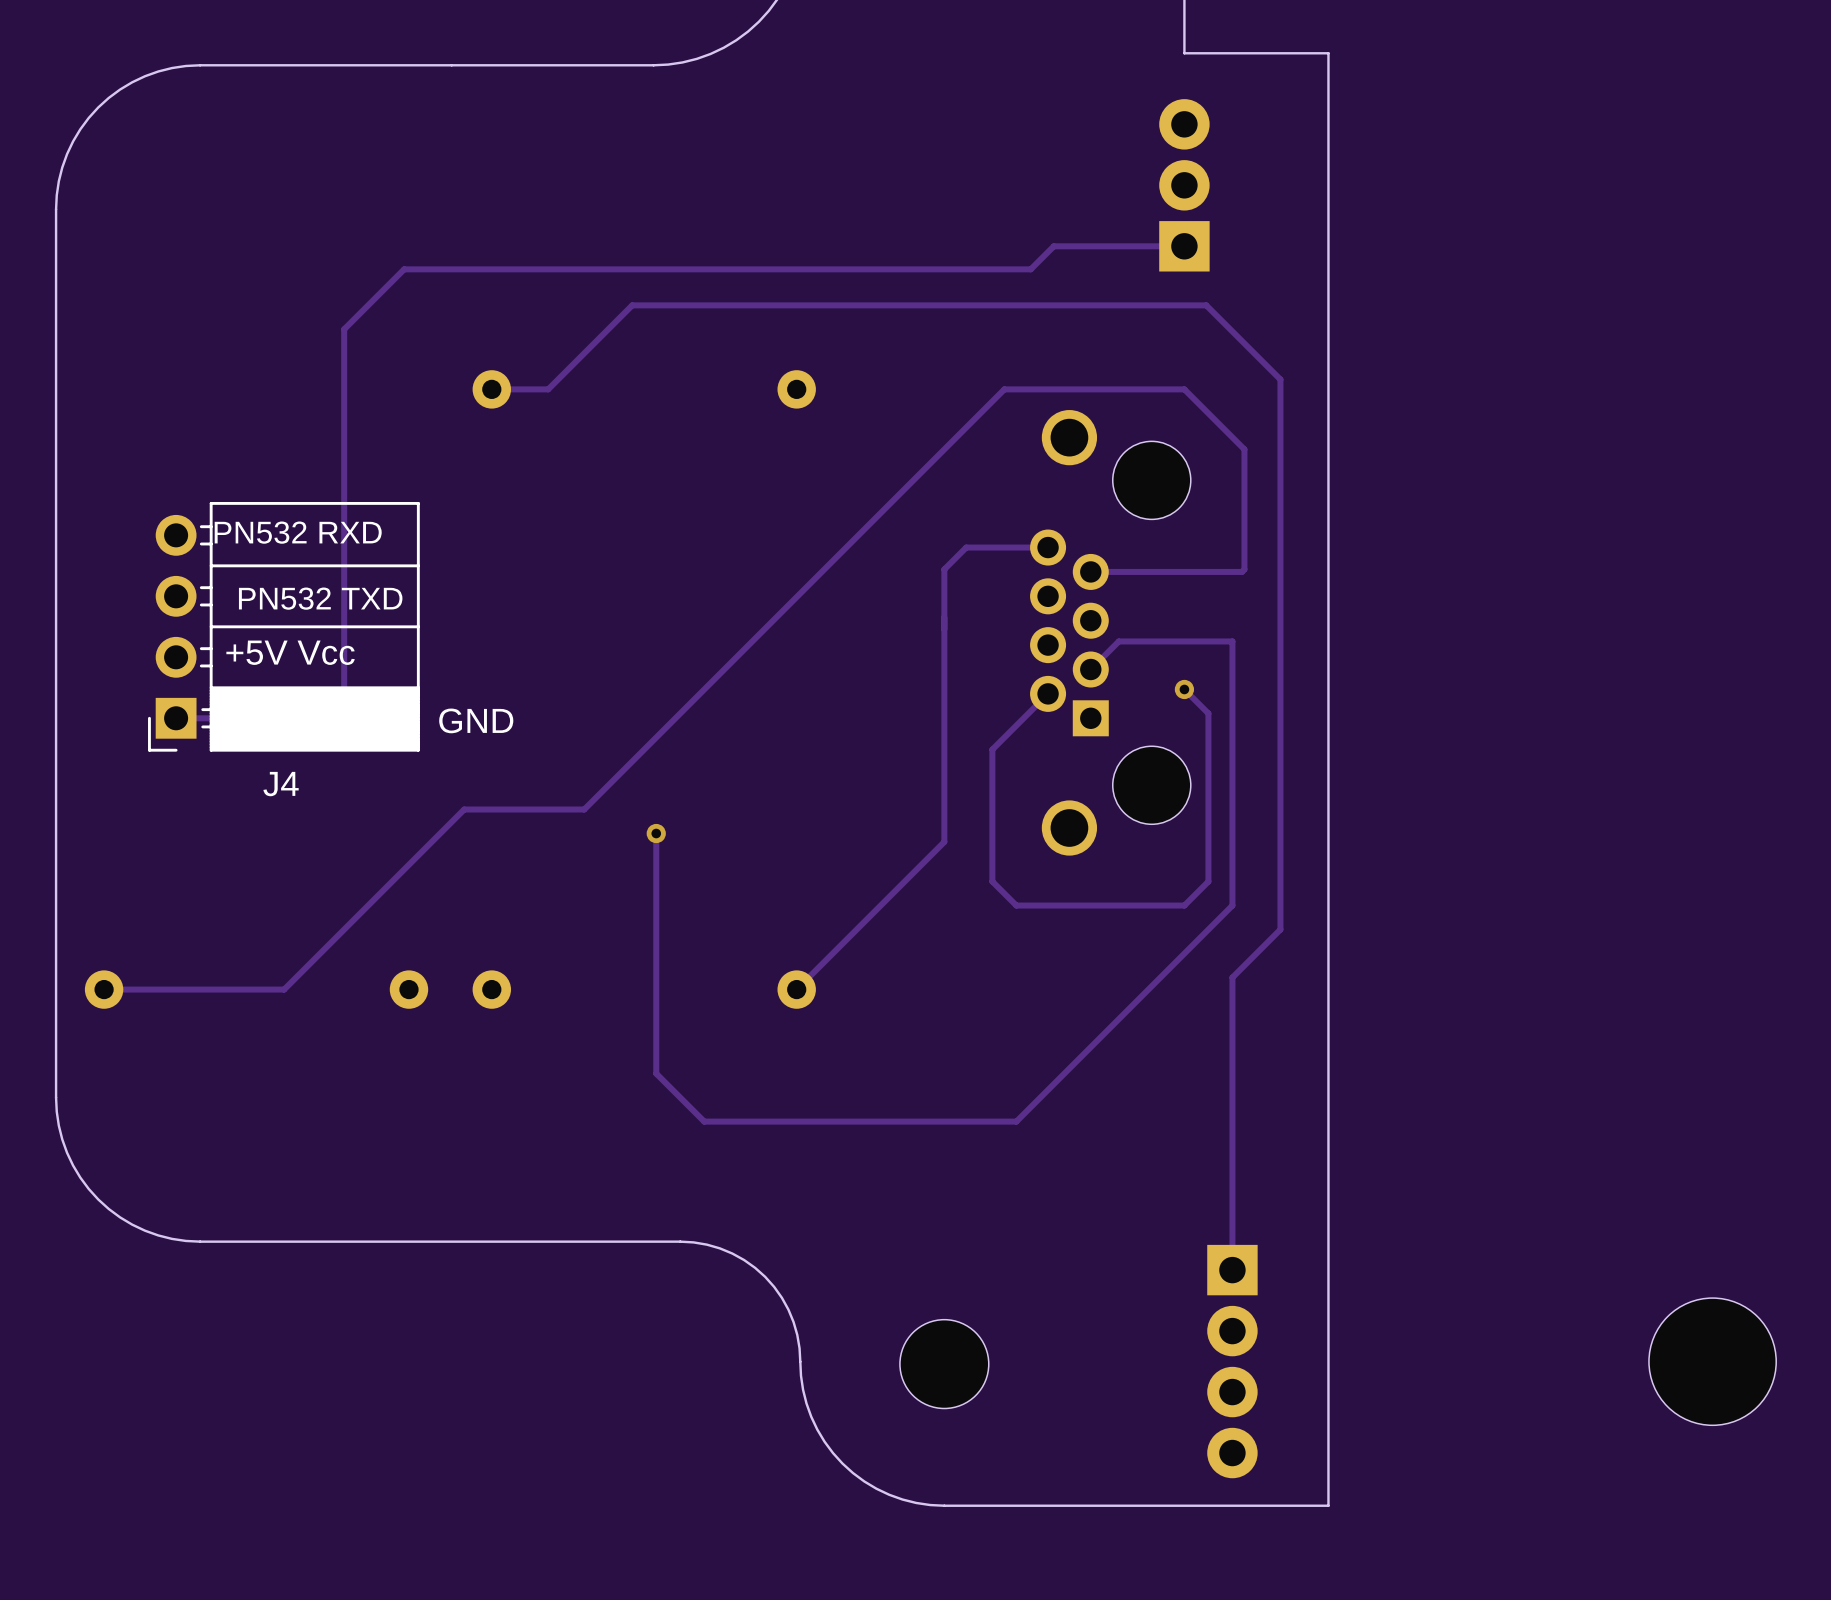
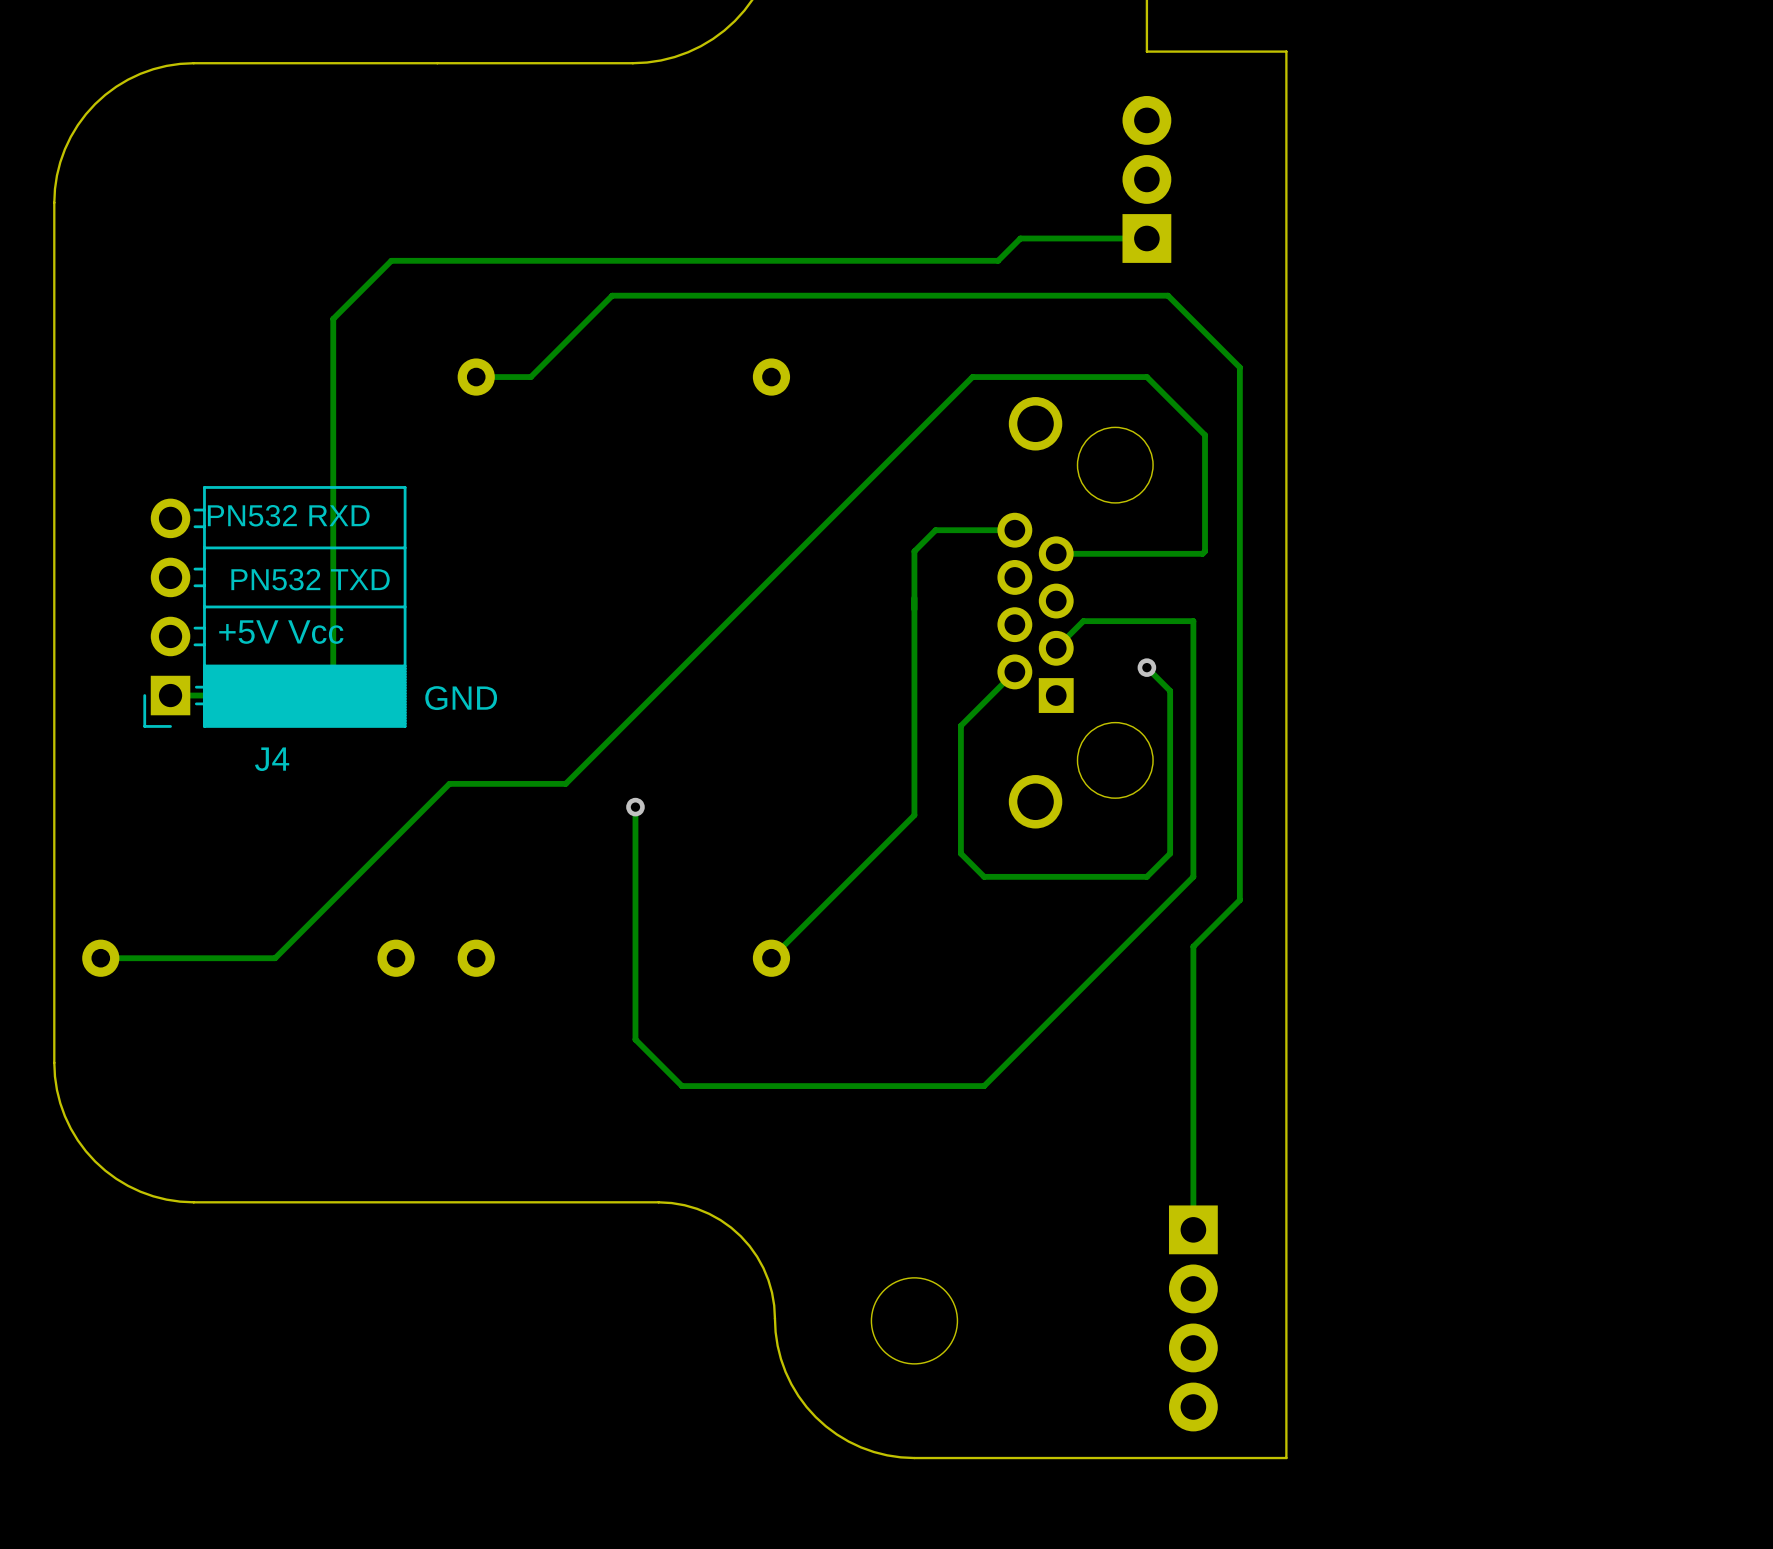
part: (1712, 1361) -> none

